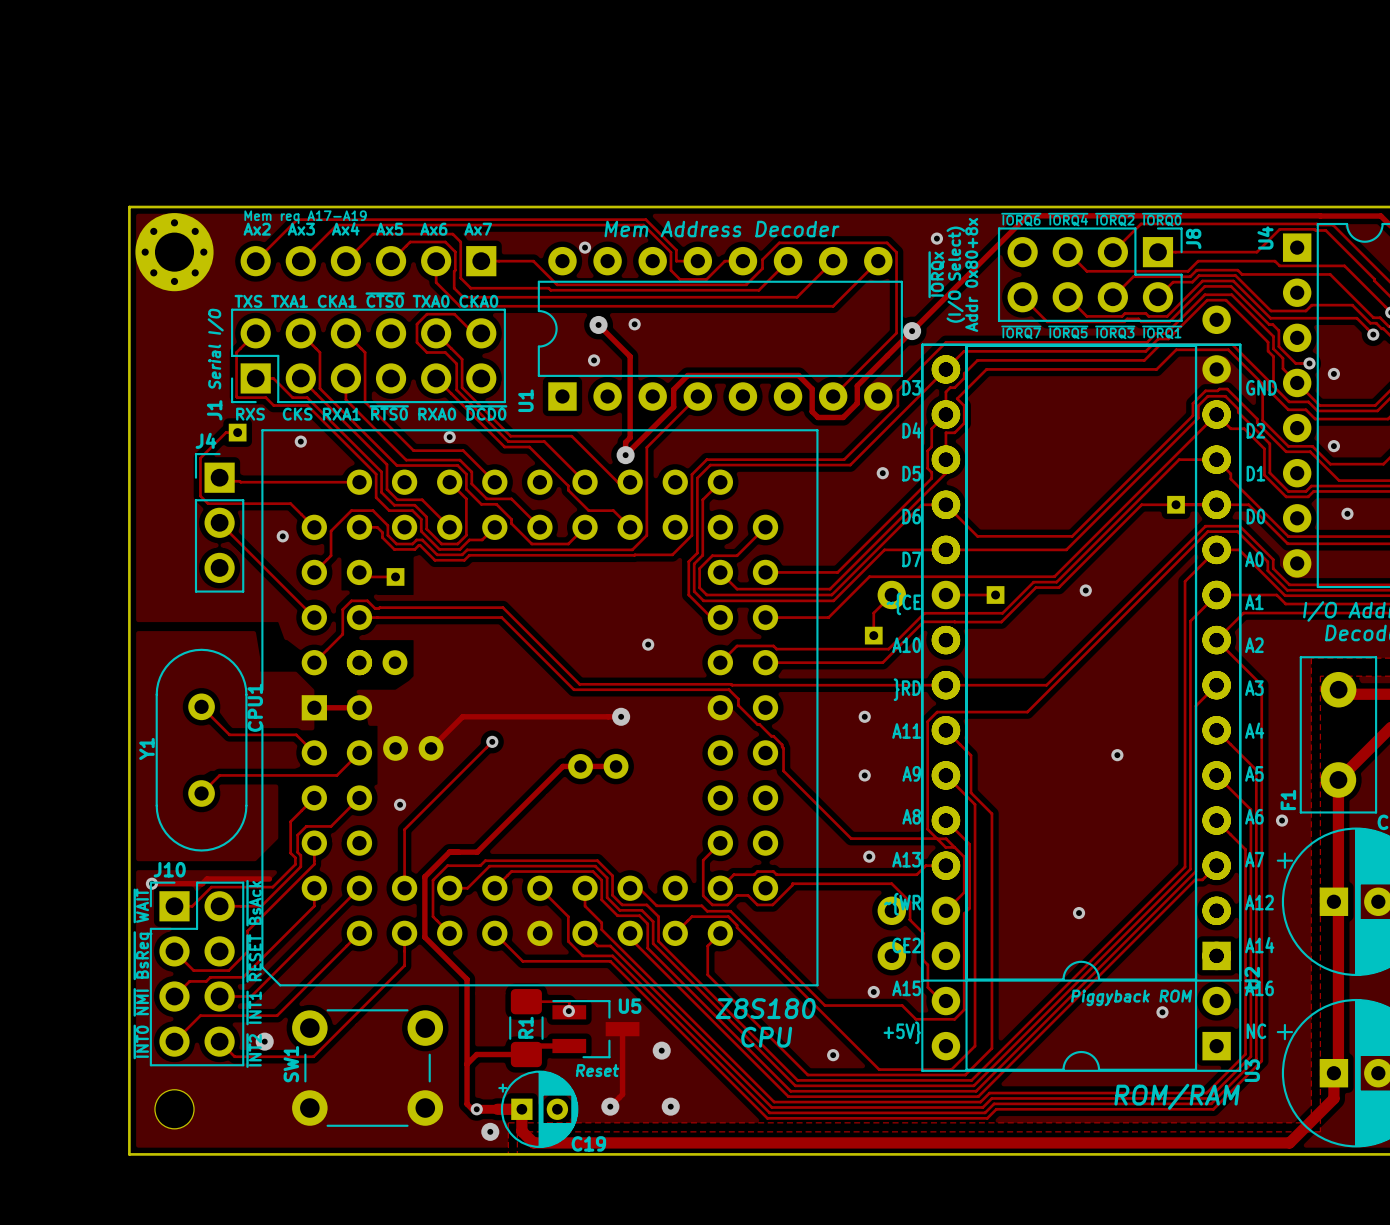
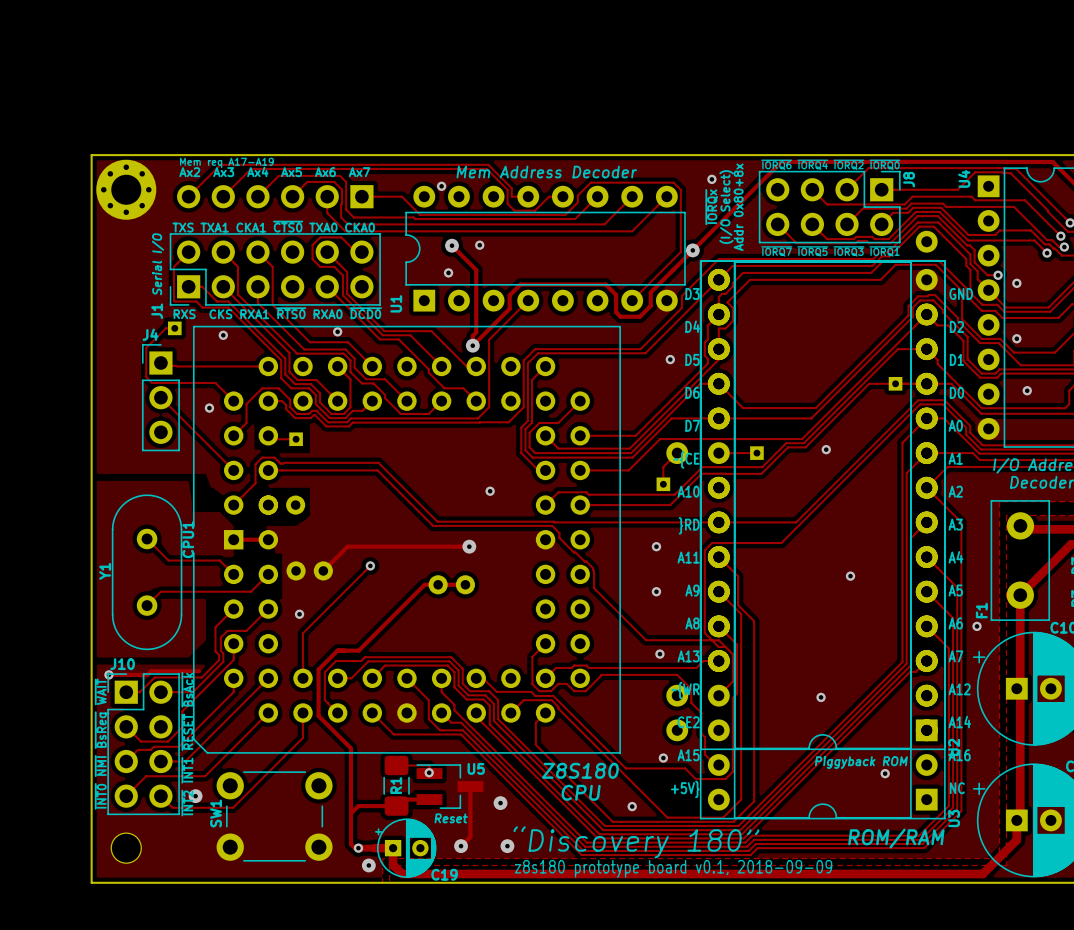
text: none -> “Discovery 180” (636, 842)
text: none -> z8s180 prototype board v0.1, 2018-09-09 (673, 868)

